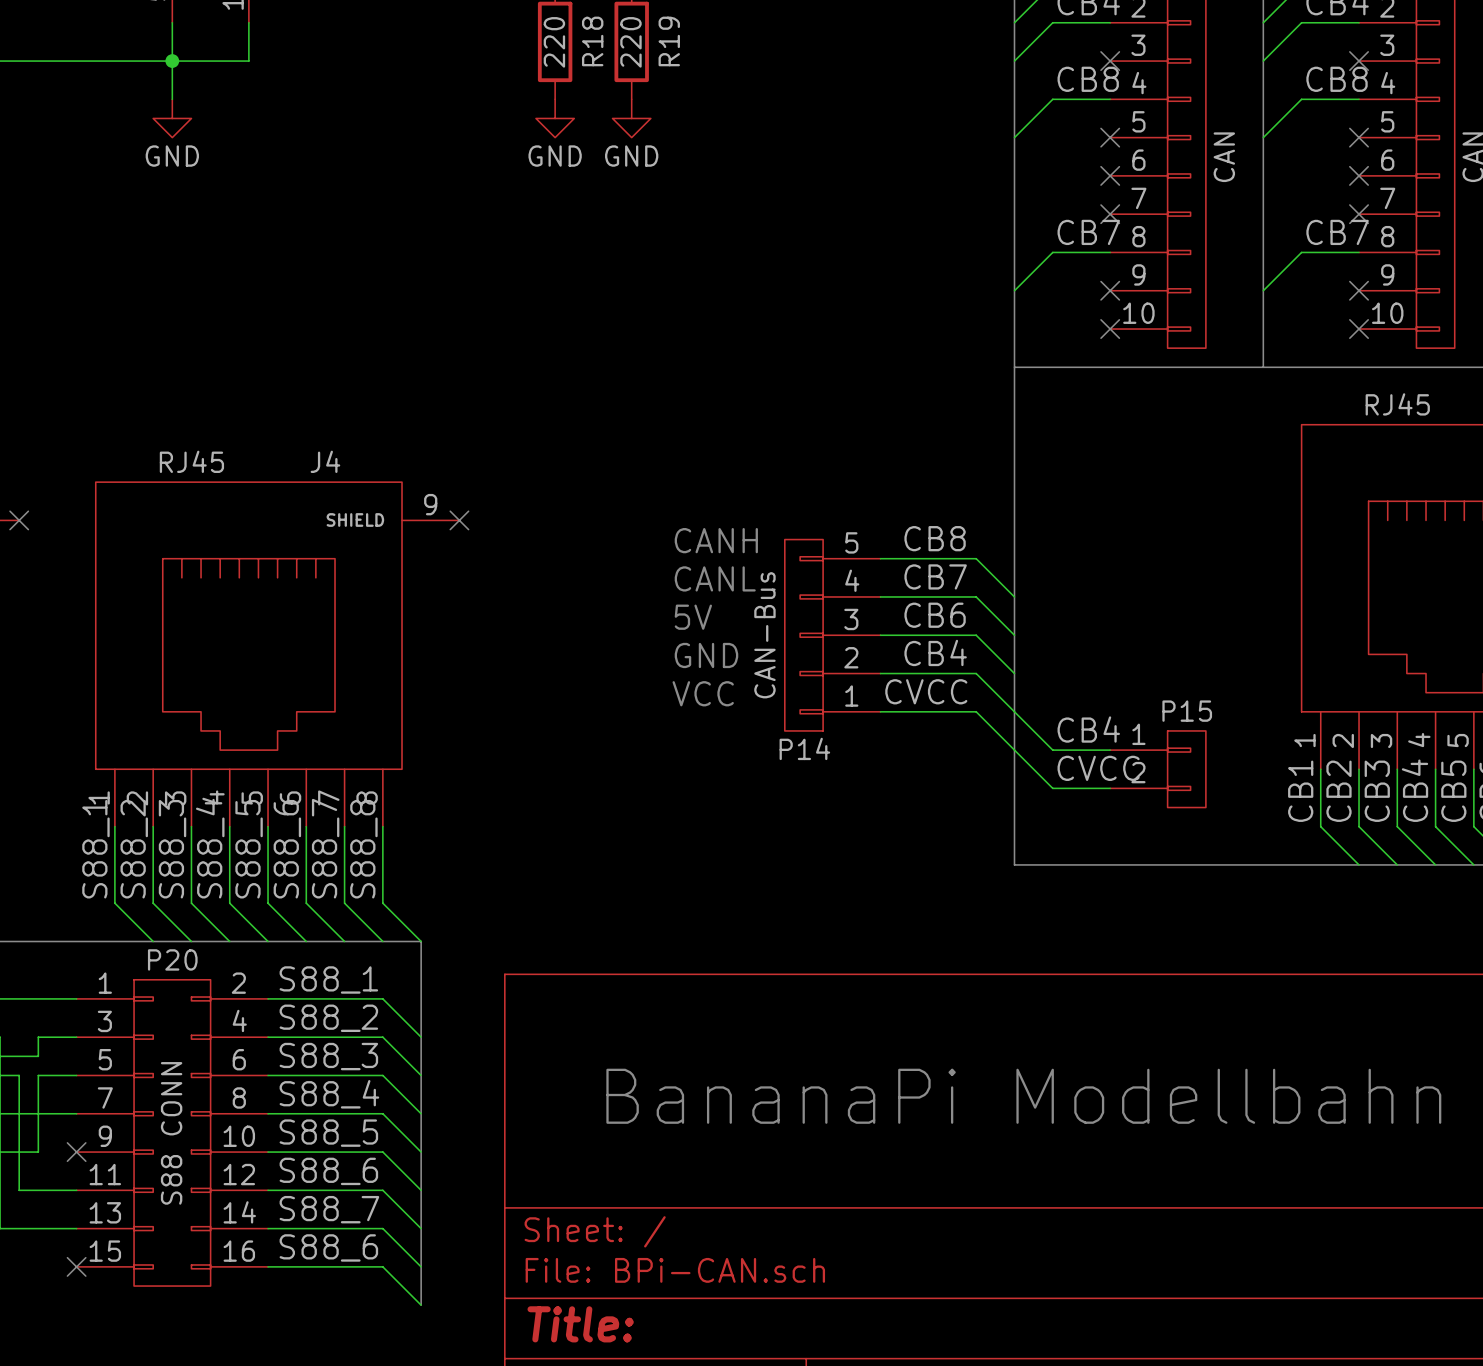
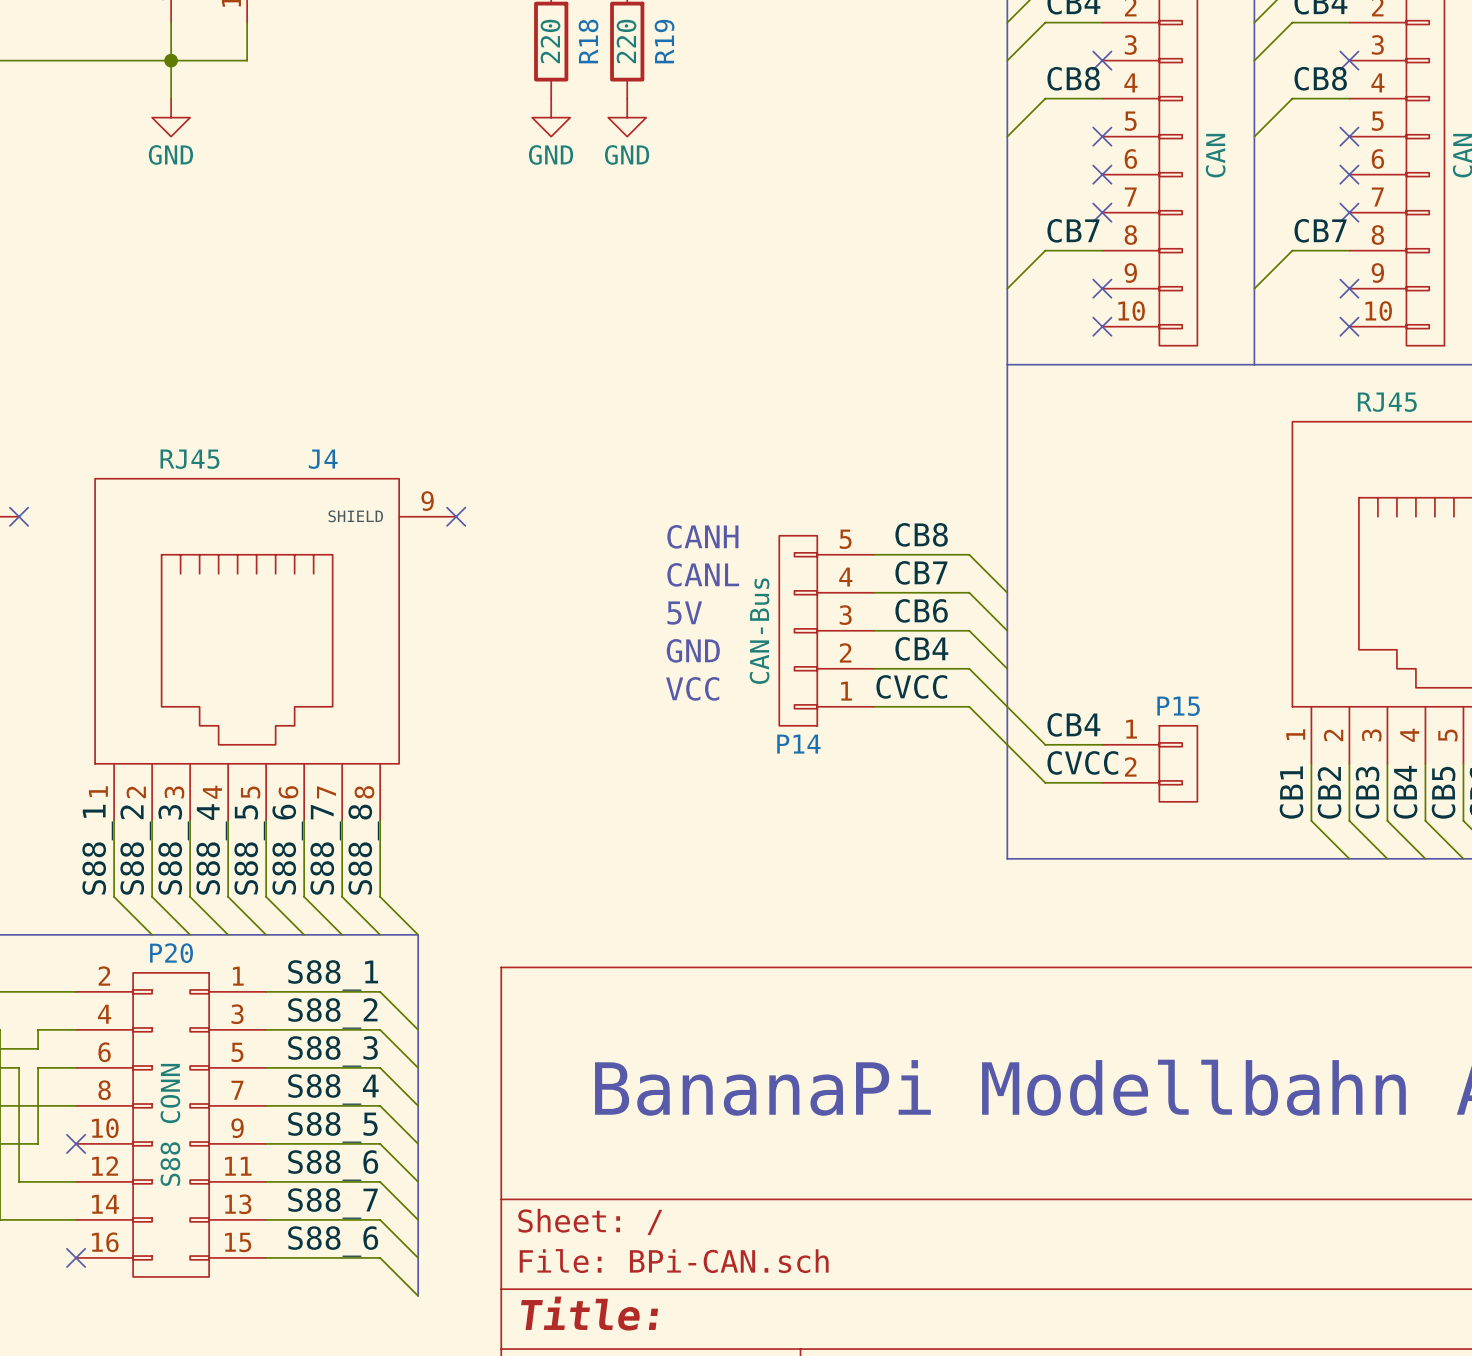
P20 flip: as is (172, 1132) -> left-right (171, 1124)

